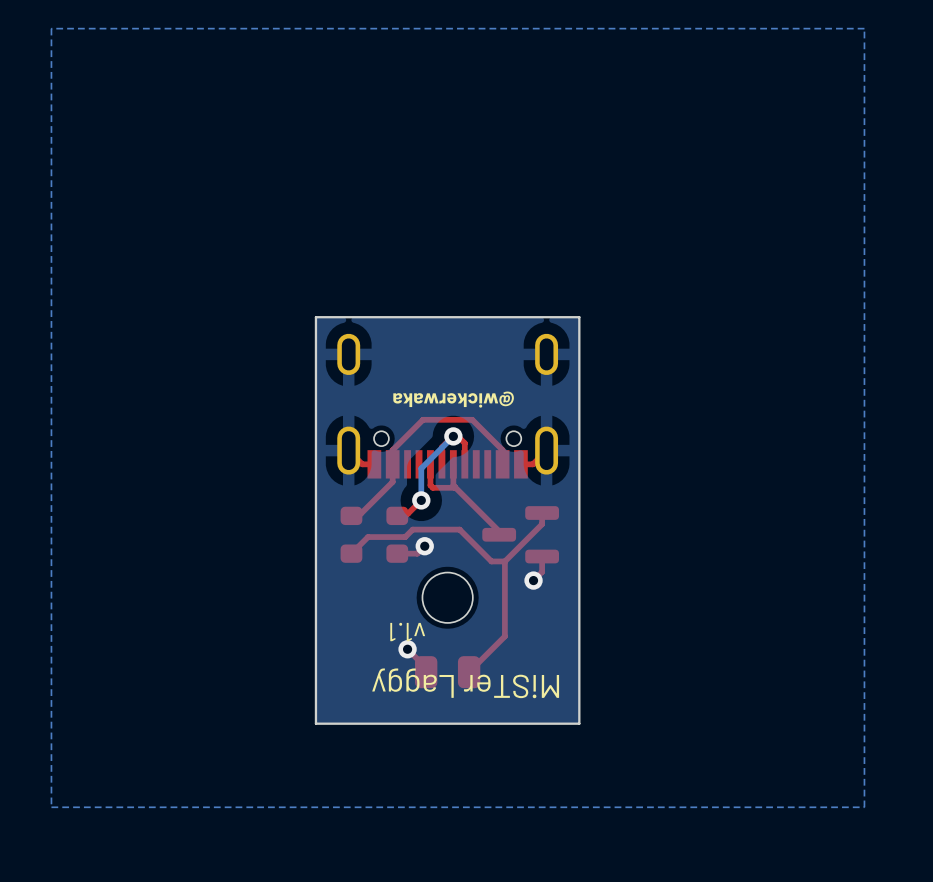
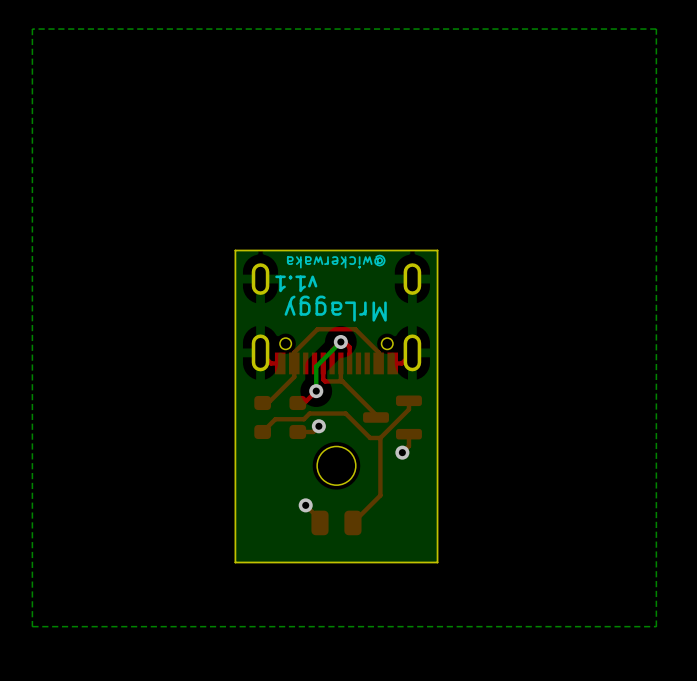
text: none -> MrLaggy (335, 308)
text position: @wickerwaka (453, 399) -> @wickerwaka (336, 261)
text position: v1.1 (407, 632) -> v1.1 (296, 283)
text: MiSTer Laggy (465, 683) -> none

